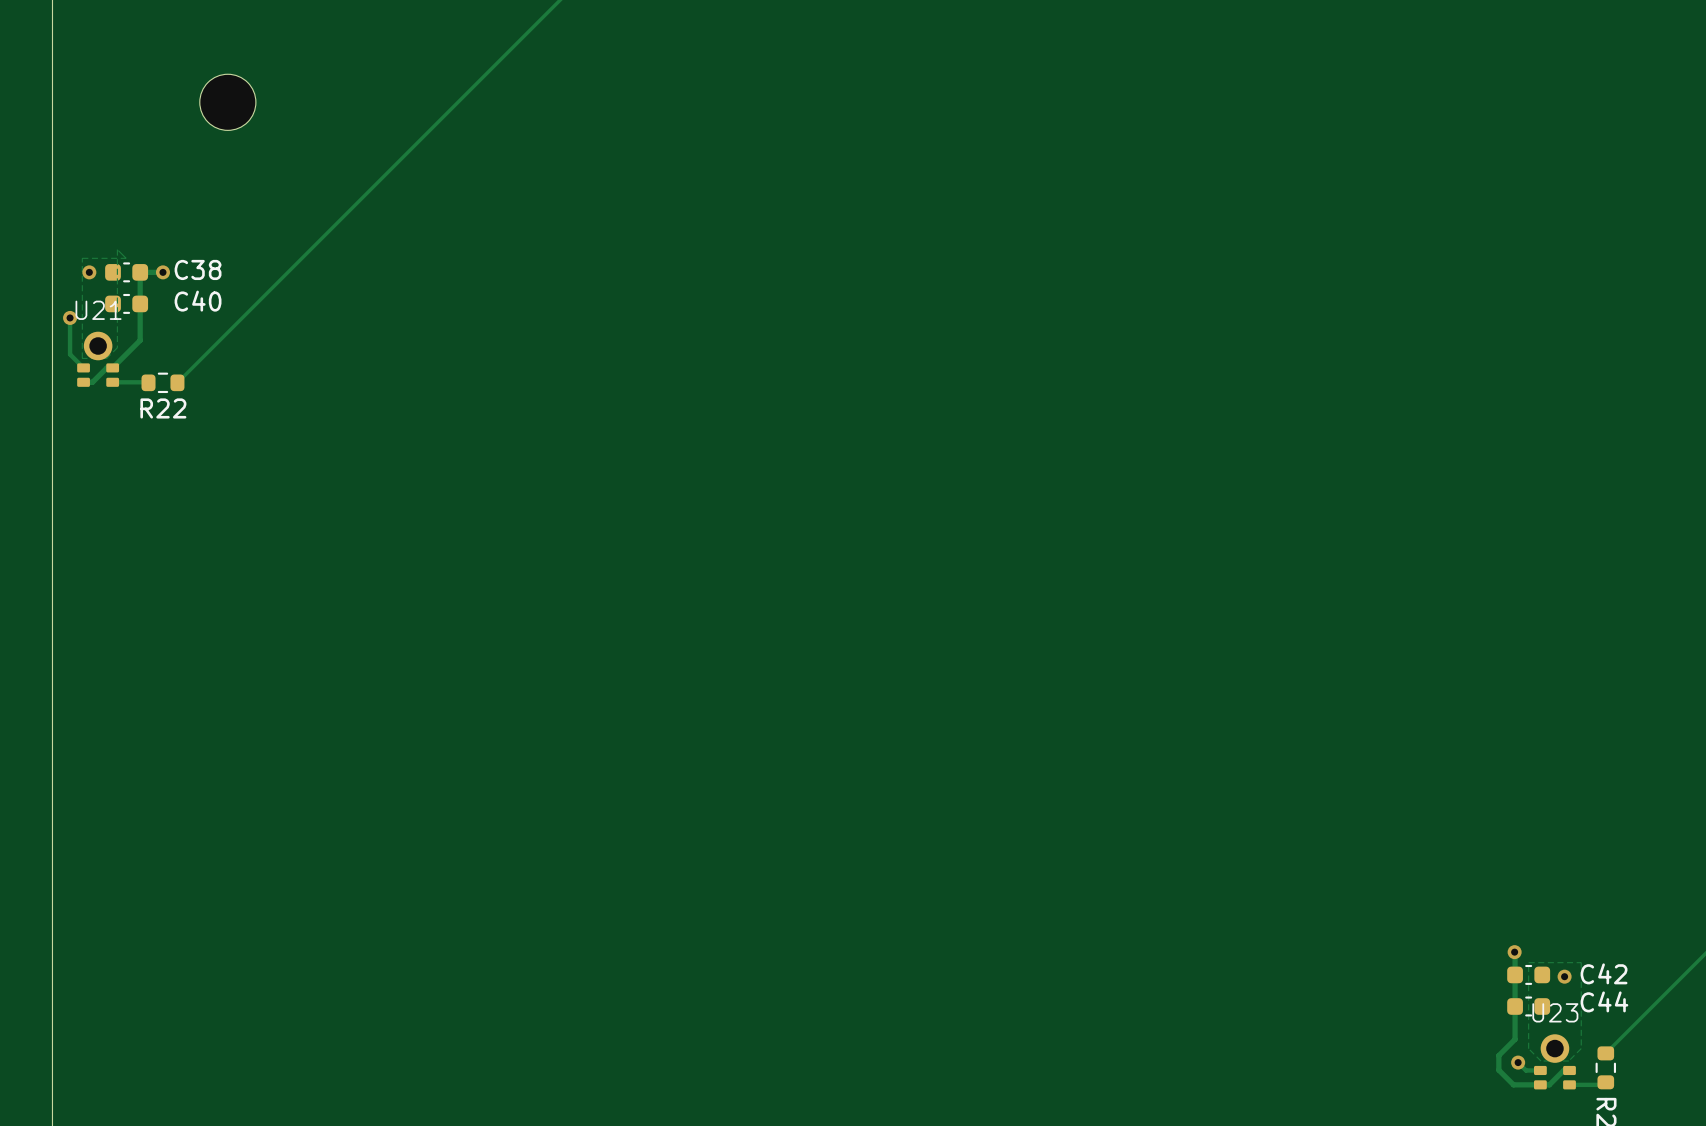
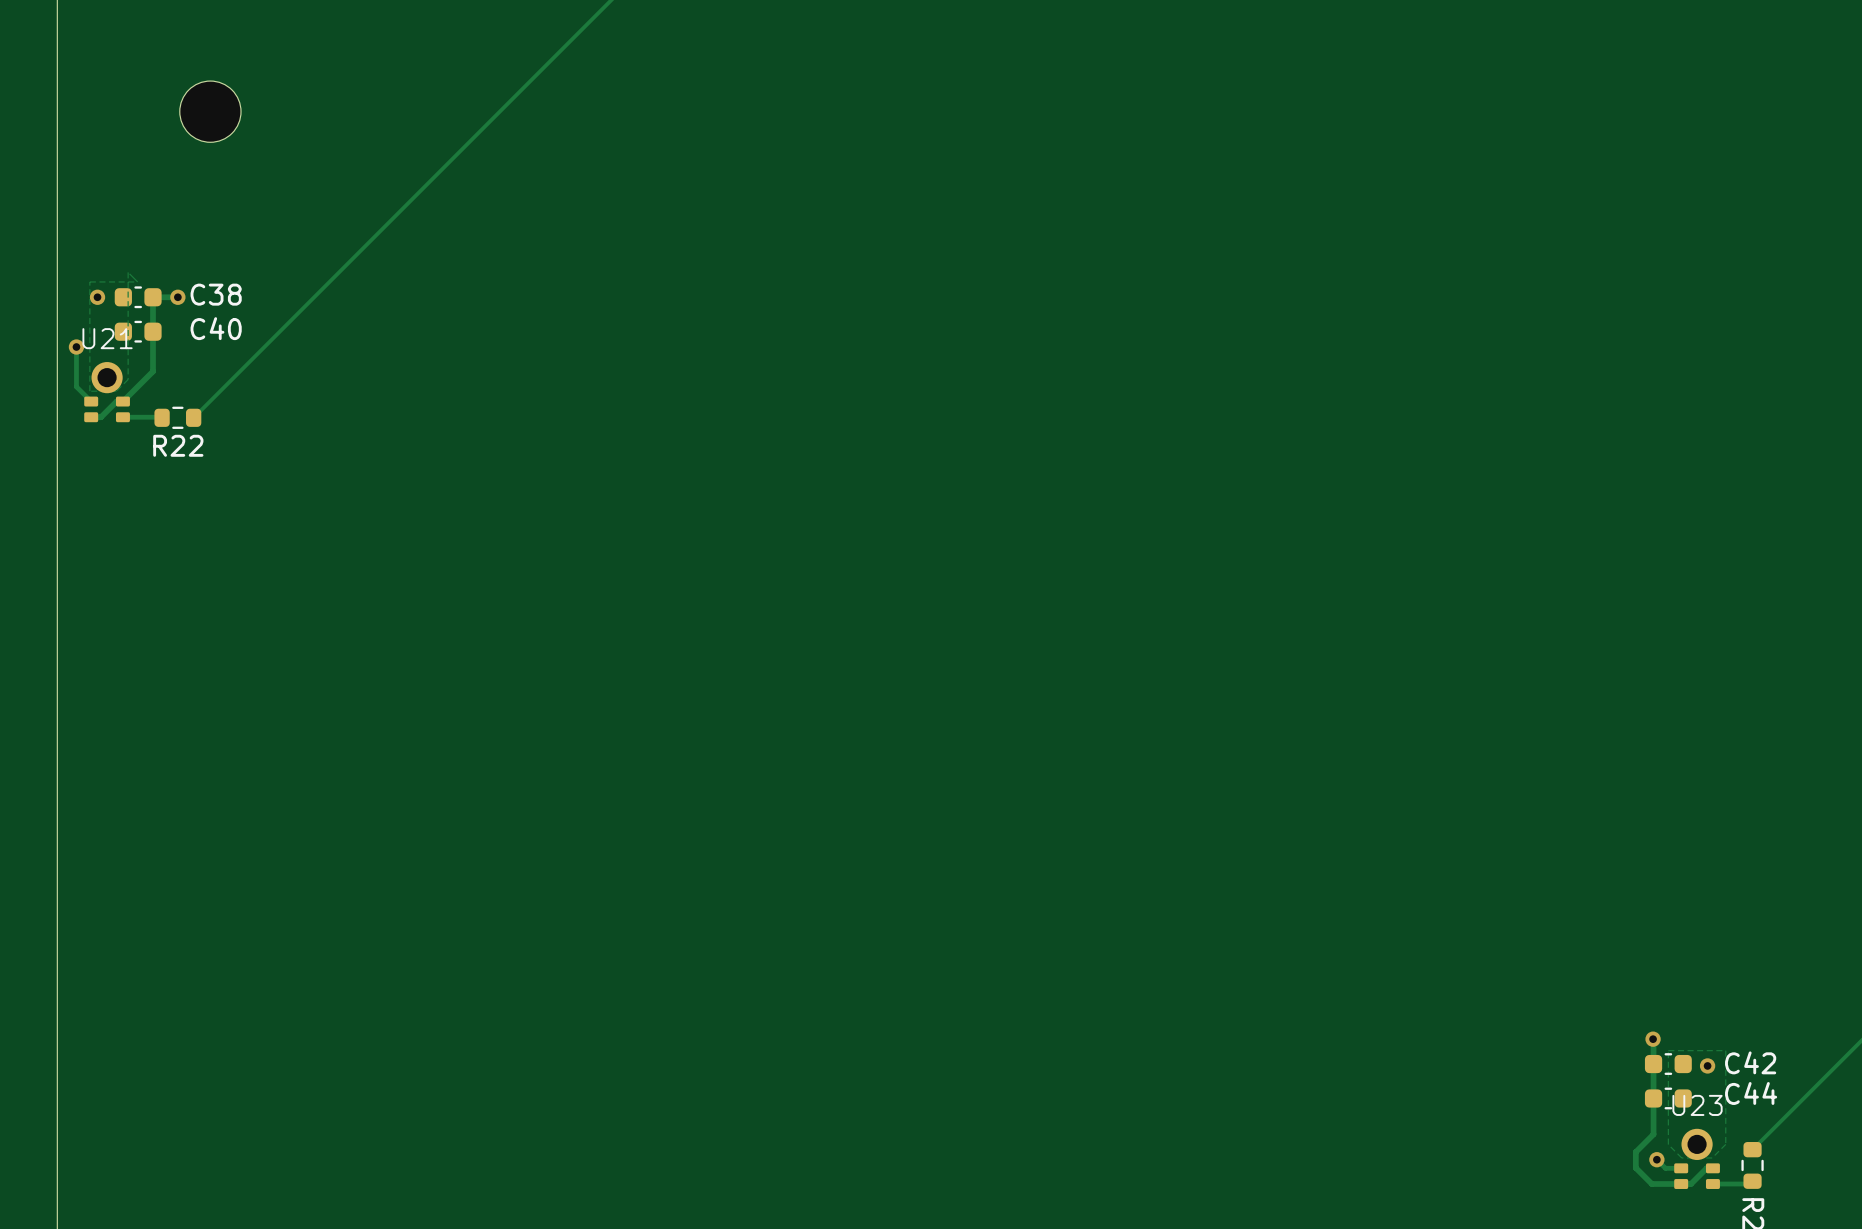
part position: (227, 102) -> (210, 111)

